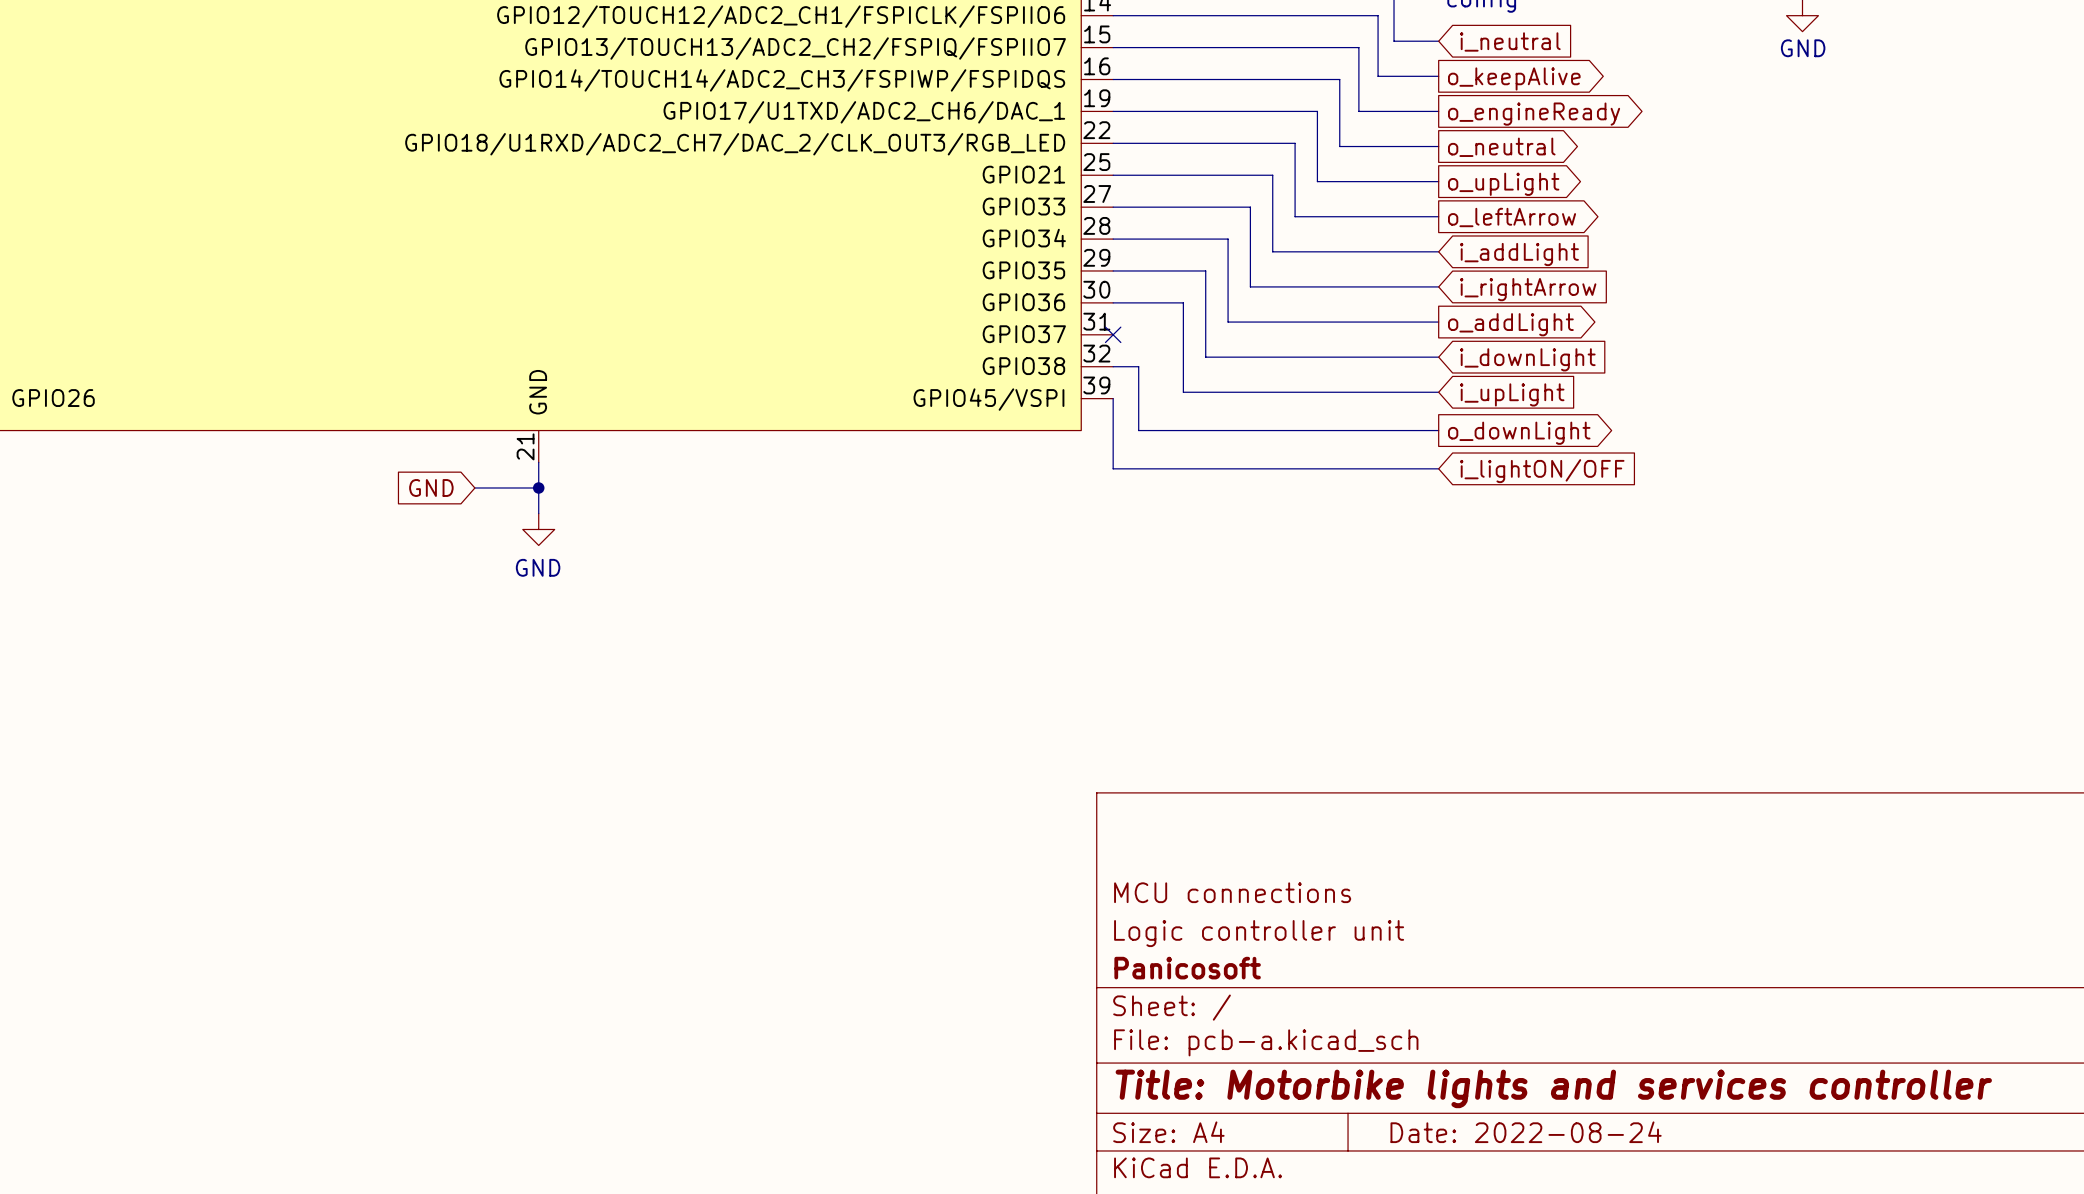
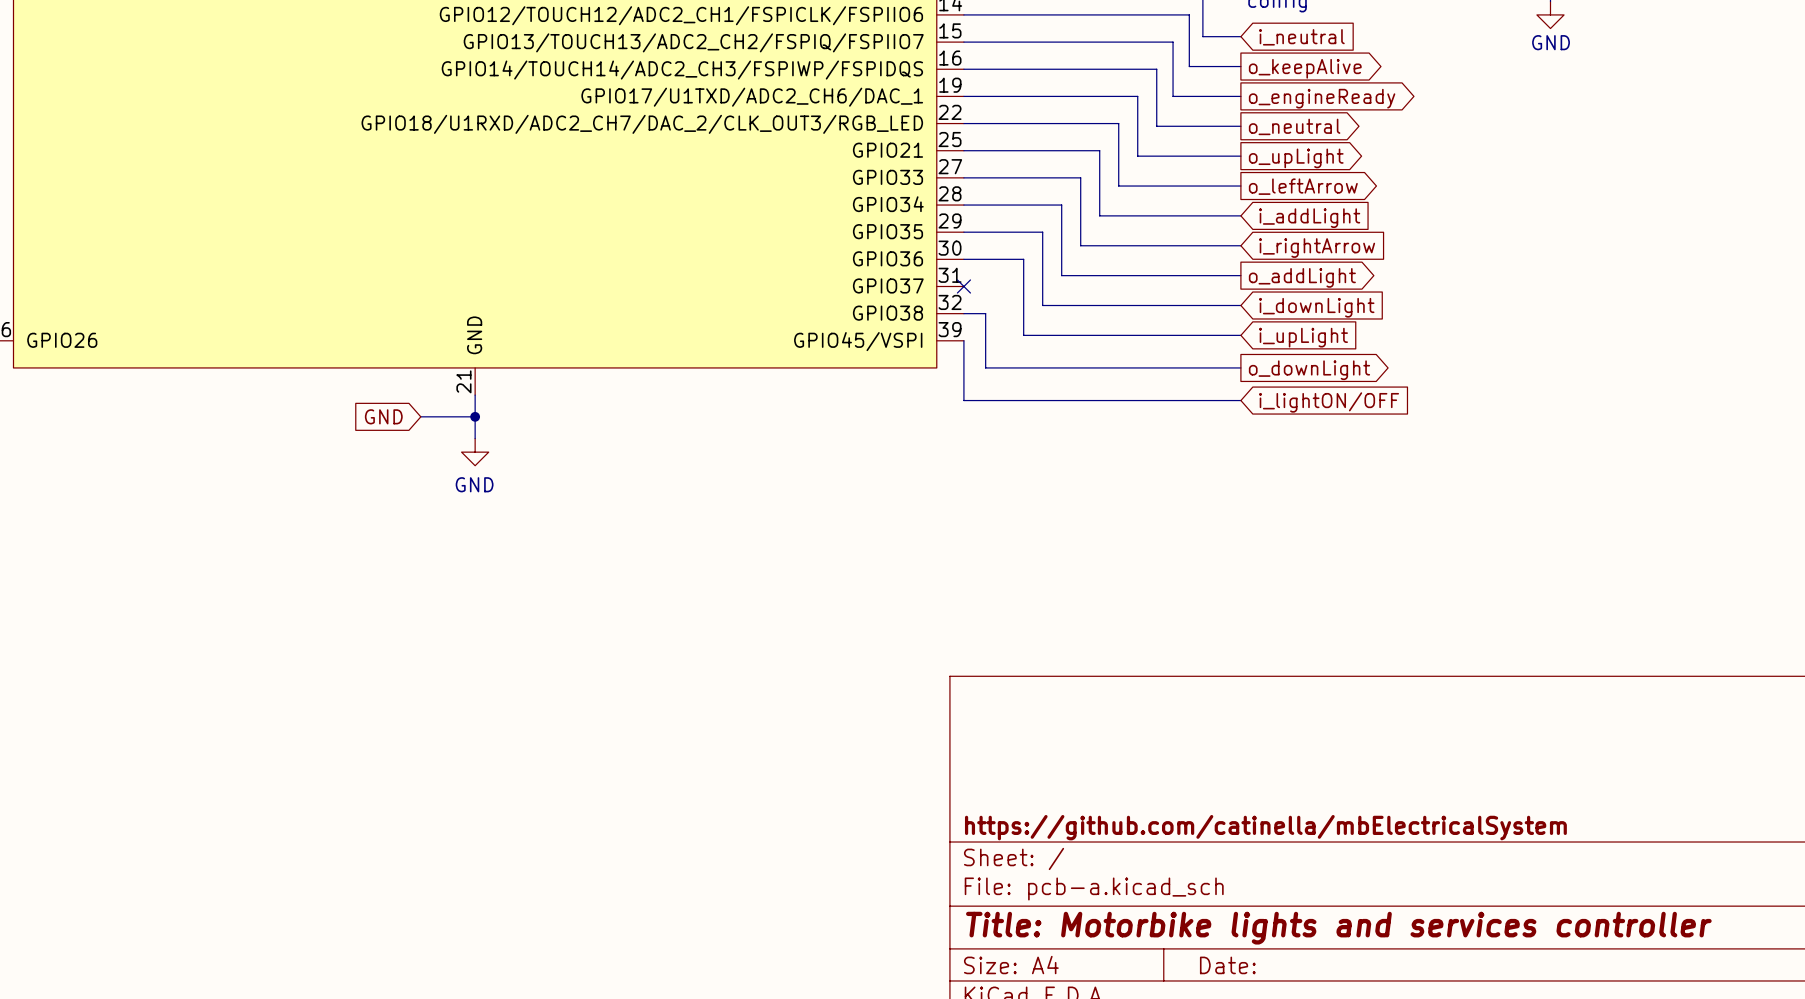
title block: MCU connections (1232, 892) -> none
title block: Logic controller unit (1259, 933) -> none
title block: Panicosoft (1187, 968) -> https://github.com/catinella/mbElectricalSystem (1265, 827)
title block: Date: 2022-08-24 (1526, 1132) -> Date: (1227, 965)

